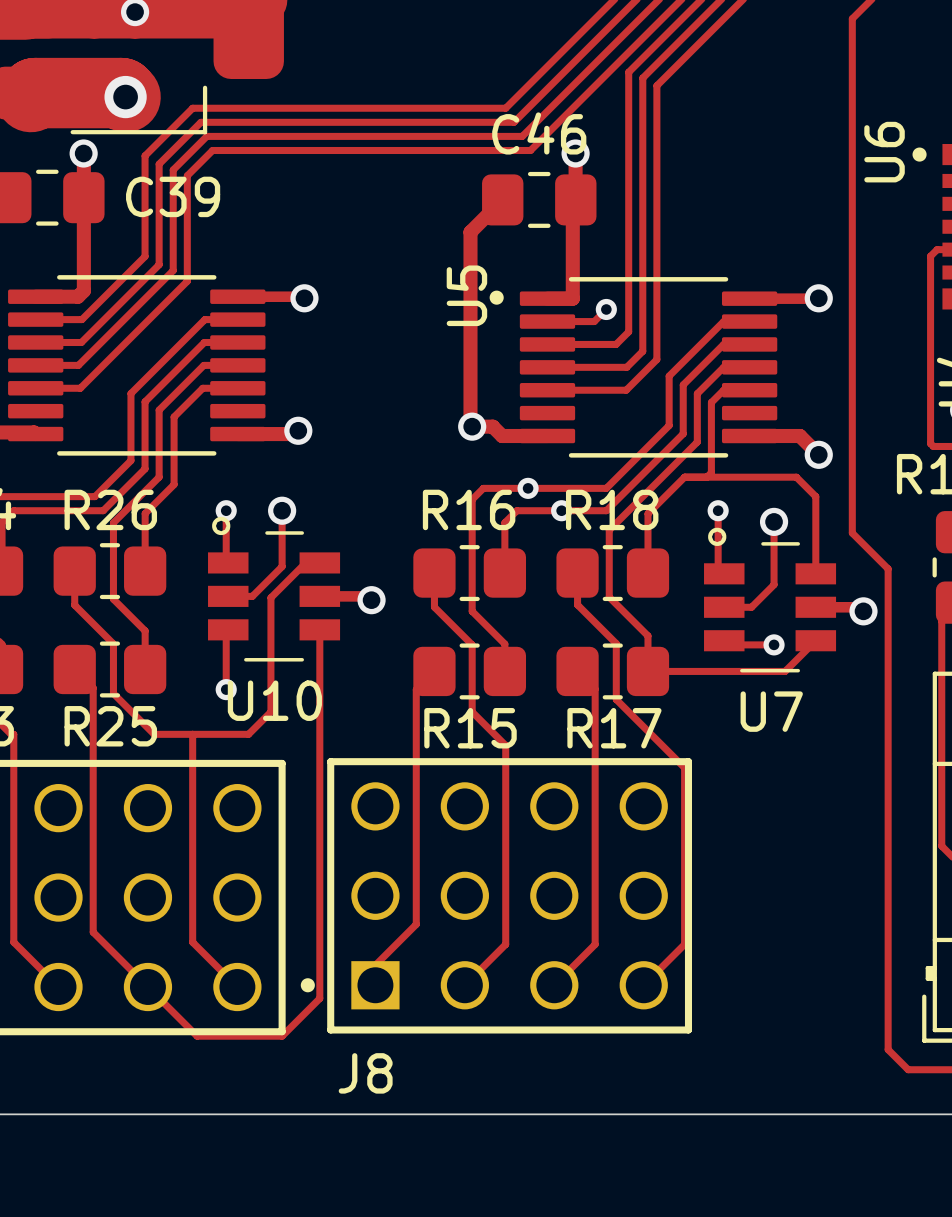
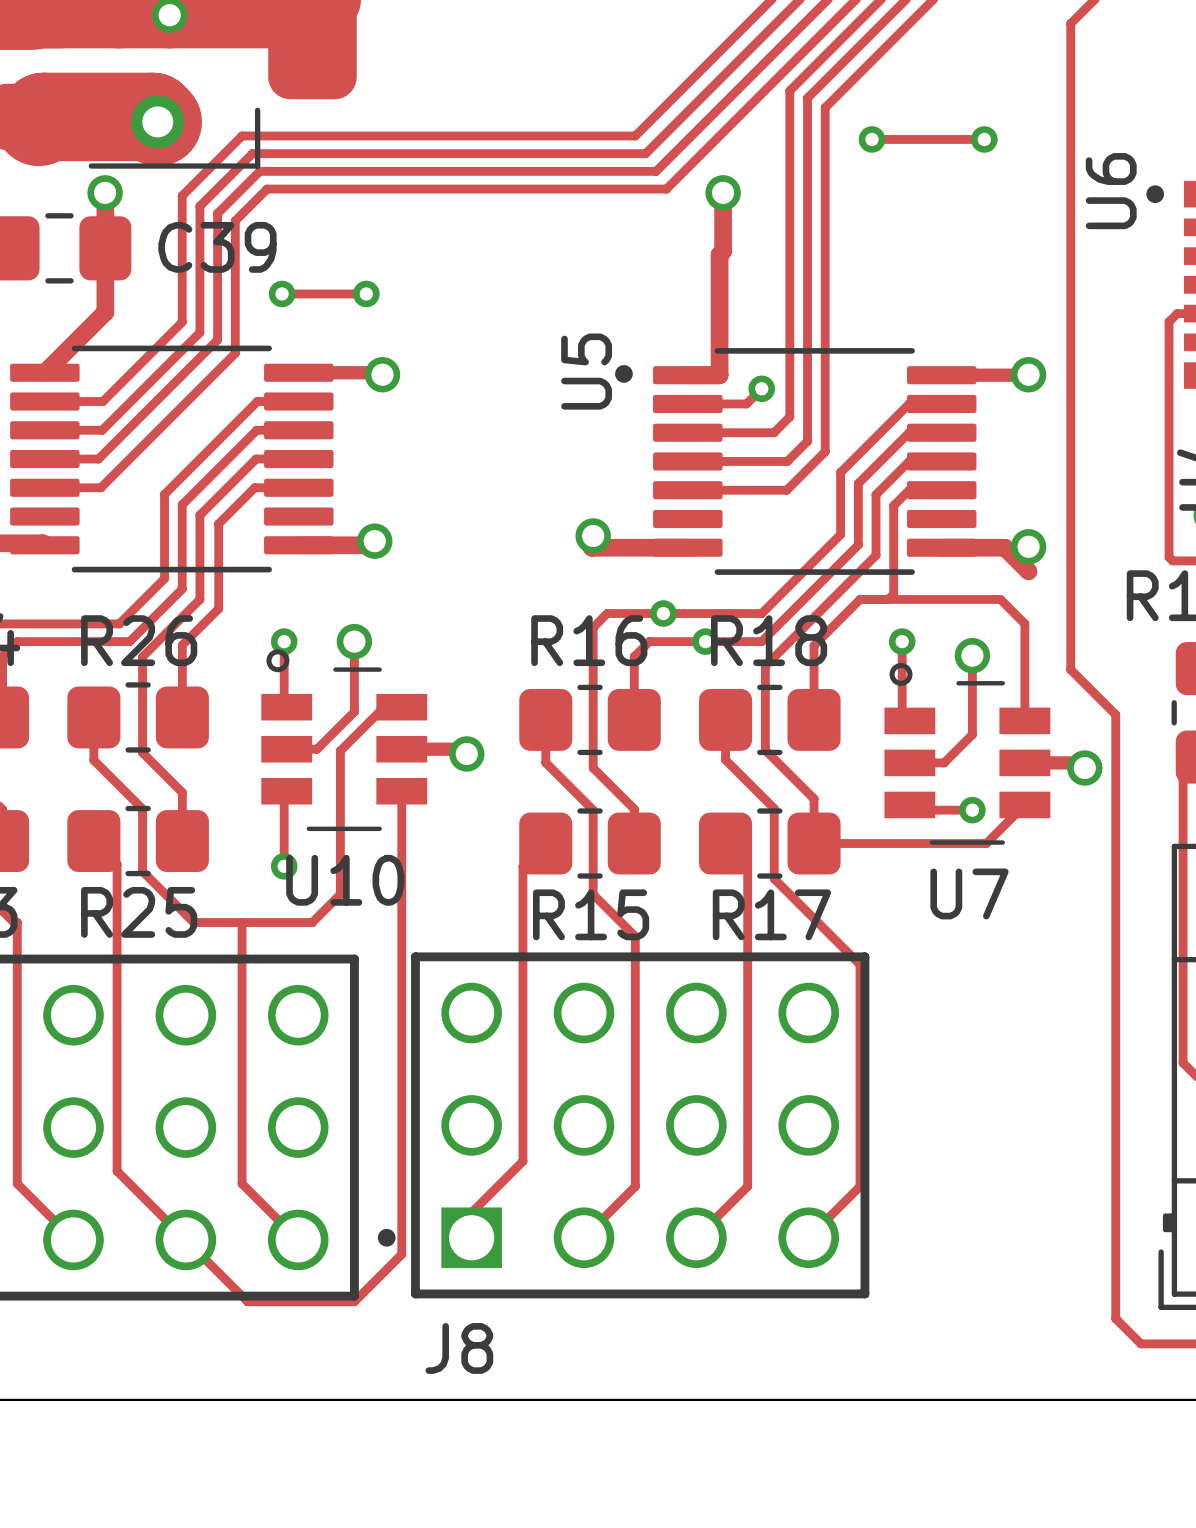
track: none -> (871, 139) (984, 139)
via: none -> (871, 139)
via: none -> (984, 139)
track: (502, 199) (470, 232) (470, 424) (472, 426) (492, 426) (502, 436) -> (591, 546) (630, 547)
C46: (539, 199) -> none
track: none -> (282, 293) (366, 293)
via: none -> (282, 293)
via: none -> (366, 293)
track: (83, 248) (83, 290) (77, 296) (35, 296) -> (105, 312) (44, 372)
via position: (818, 454) -> (1028, 546)

